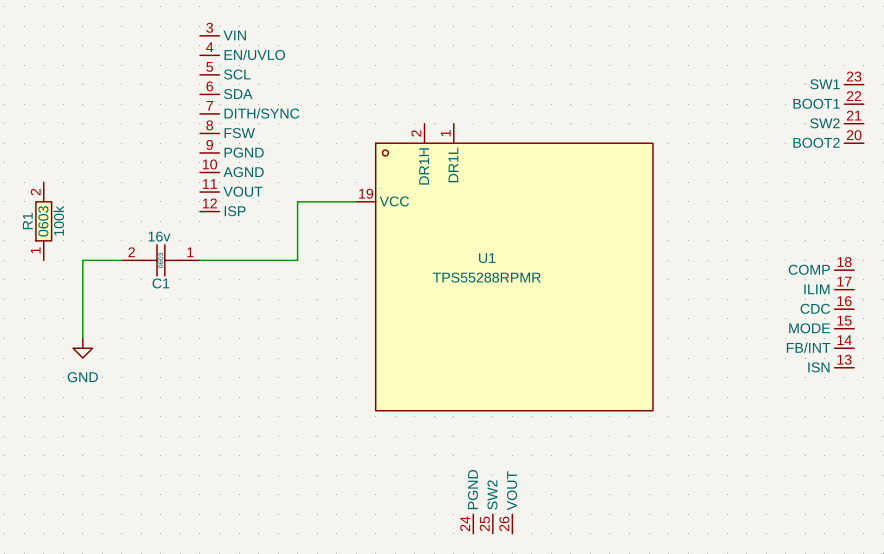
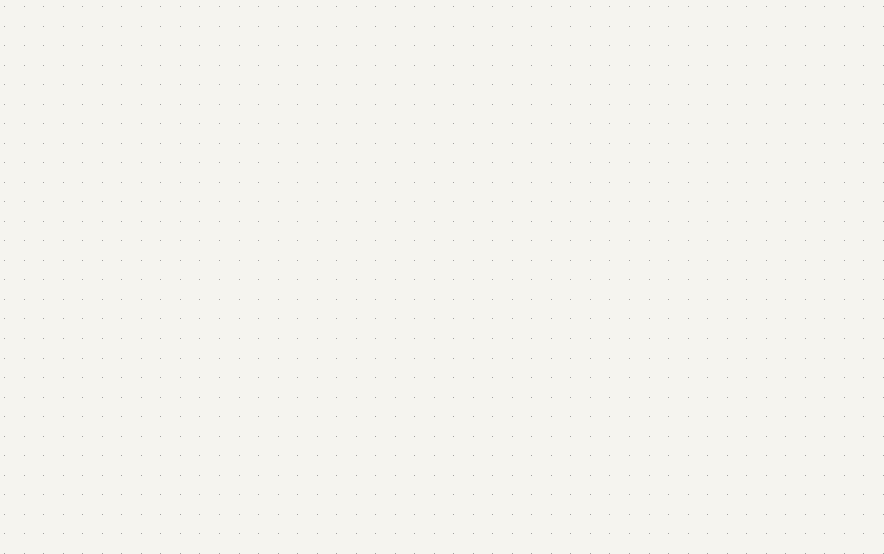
wire: (356, 201) (297, 201) (297, 260) (199, 260) -> none
R1: (43, 221) -> none
wire: (121, 260) (82, 260) (82, 338) -> none
C1: (160, 260) -> none
U1: TPS55288RPMR (531, 284) -> none
power symbol: GND (82, 348) -> none

